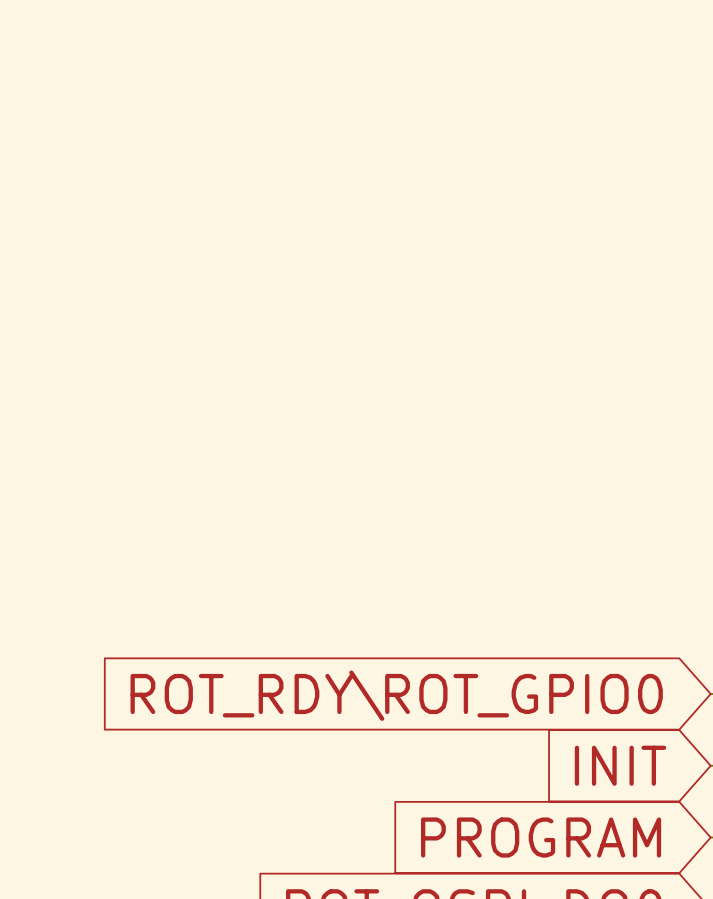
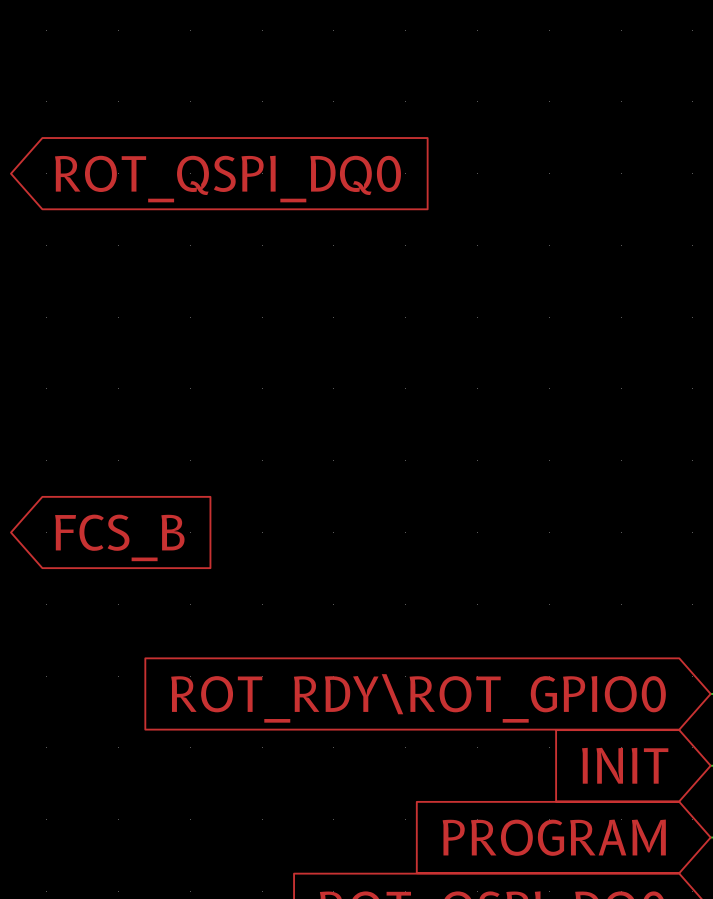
global label: none -> ROT_QSPI_DQ0 (227, 179)
global label: none -> FCS_B (119, 537)

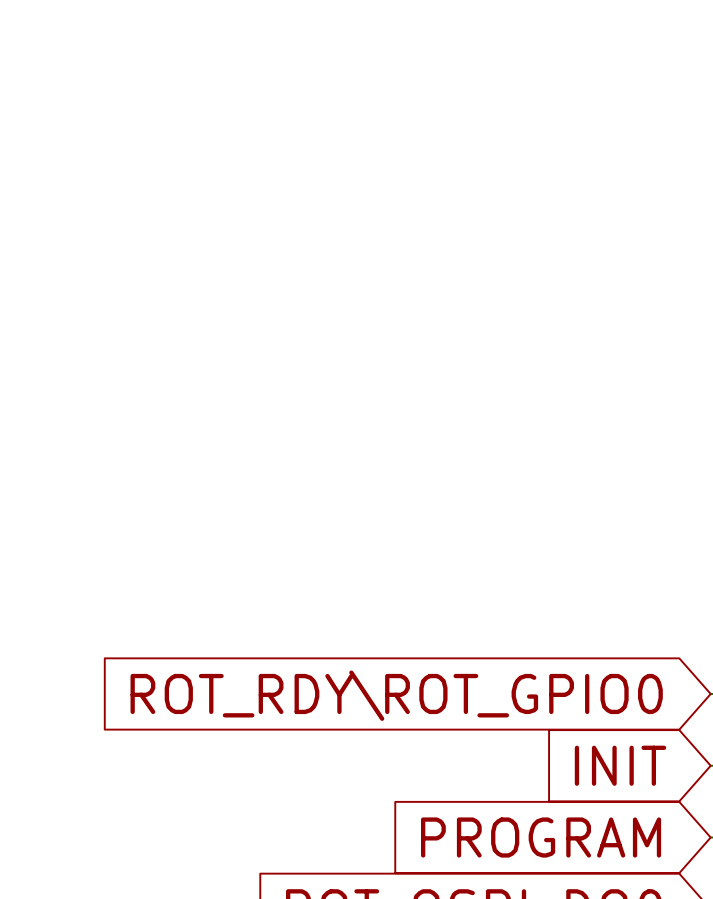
global label: ROT_QSPI_DQ0 (227, 179) -> none
global label: FCS_B (119, 537) -> none

